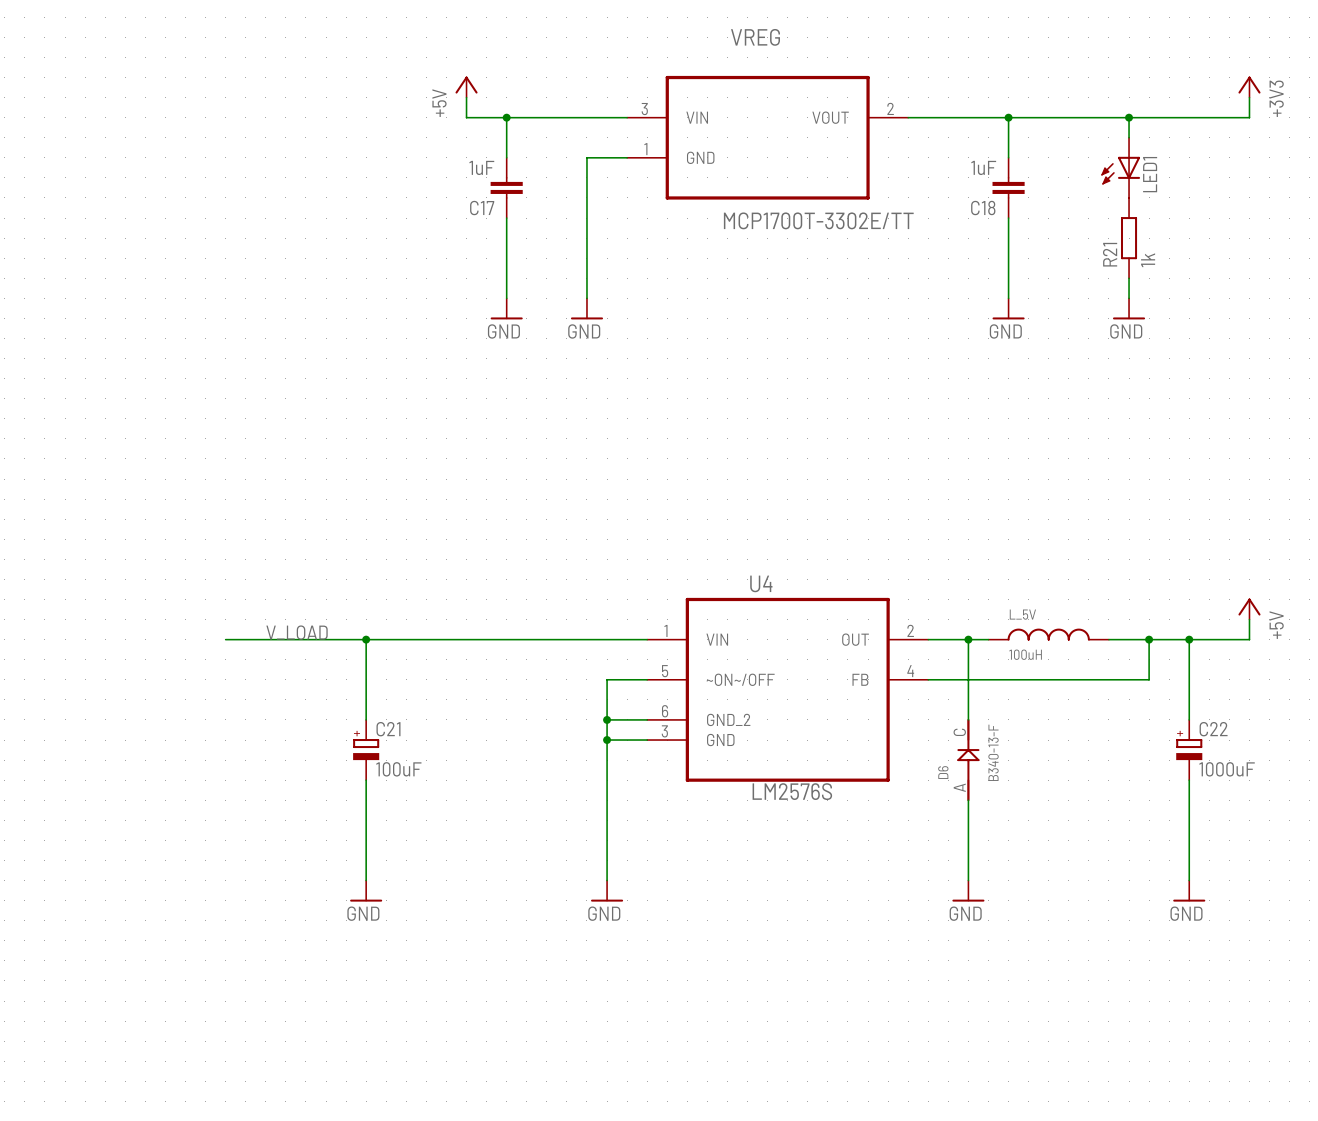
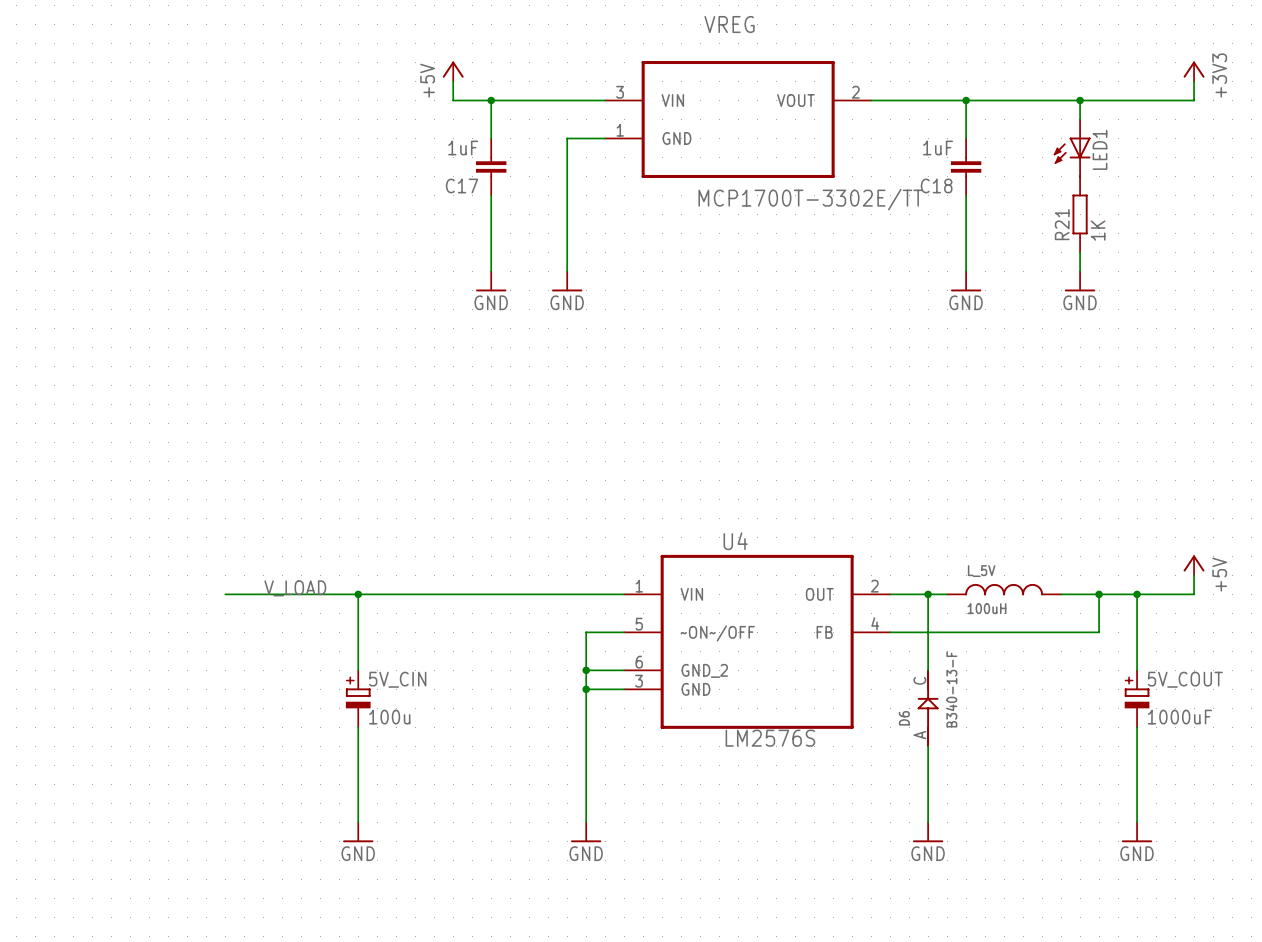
R21 value: 1k (1148, 260) -> 1K (1098, 230)
C21 name: C21 (388, 729) -> 5V_CIN (397, 679)
C22 name: C22 (1213, 729) -> 5V_COUT (1185, 679)
C21 value: 100uF (398, 769) -> 100u (389, 717)

